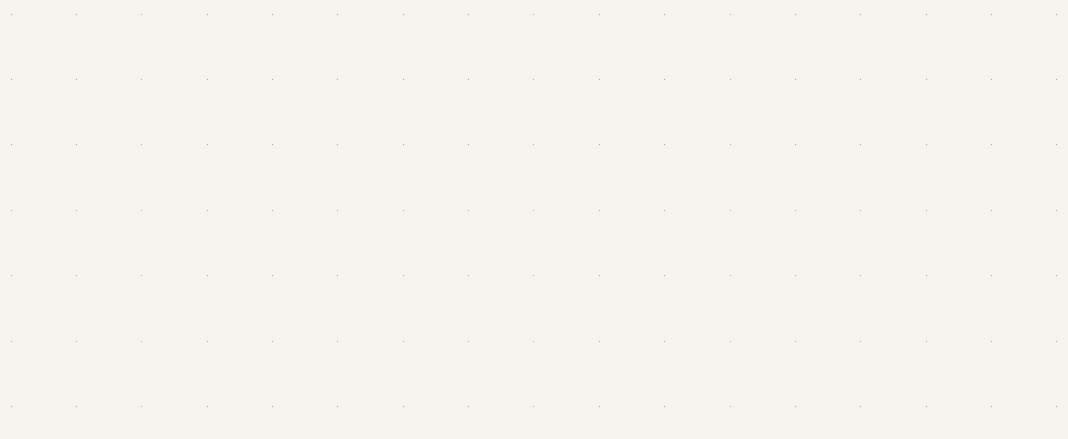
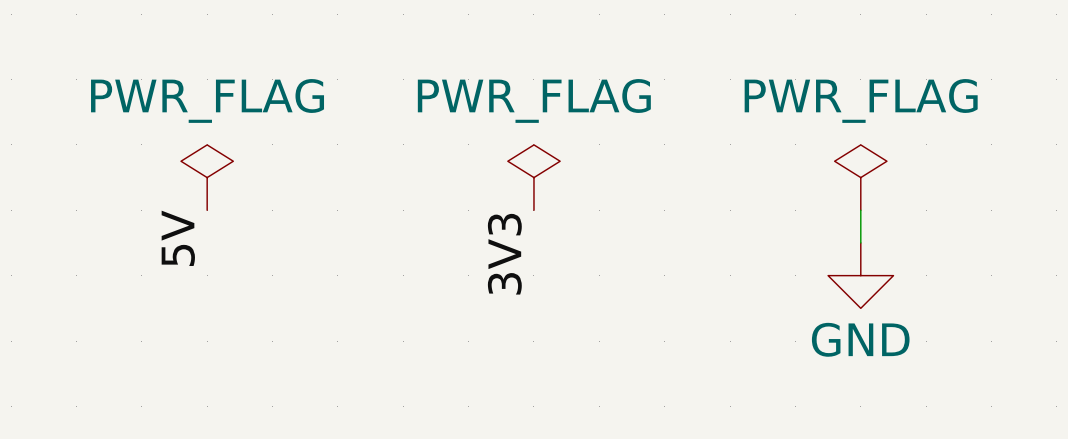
power symbol: none -> PWR_FLAG (207, 177)
power symbol: none -> PWR_FLAG (533, 177)
power symbol: none -> PWR_FLAG (860, 177)
wire: none -> (860, 210) (860, 242)
label: none -> 5V (178, 238)
label: none -> 3V3 (504, 254)
power symbol: none -> GND (860, 275)

